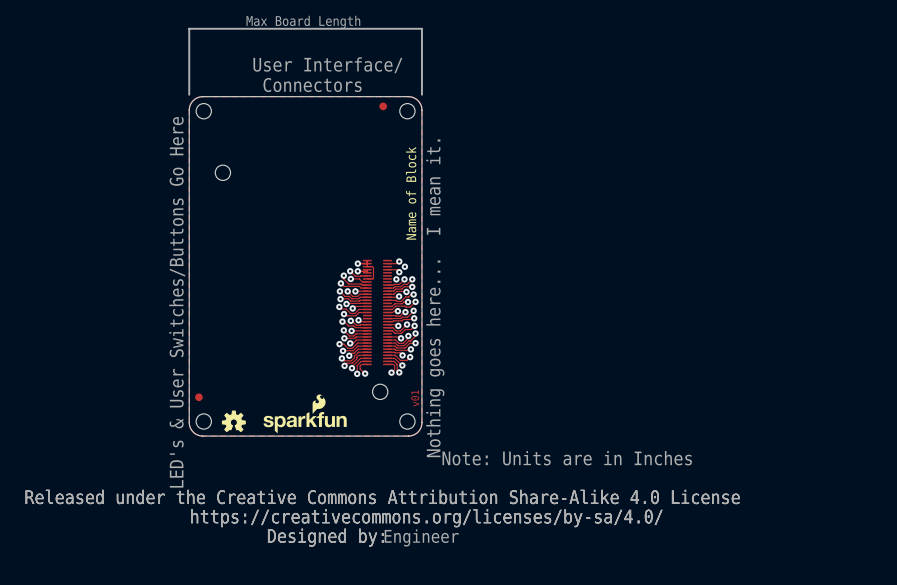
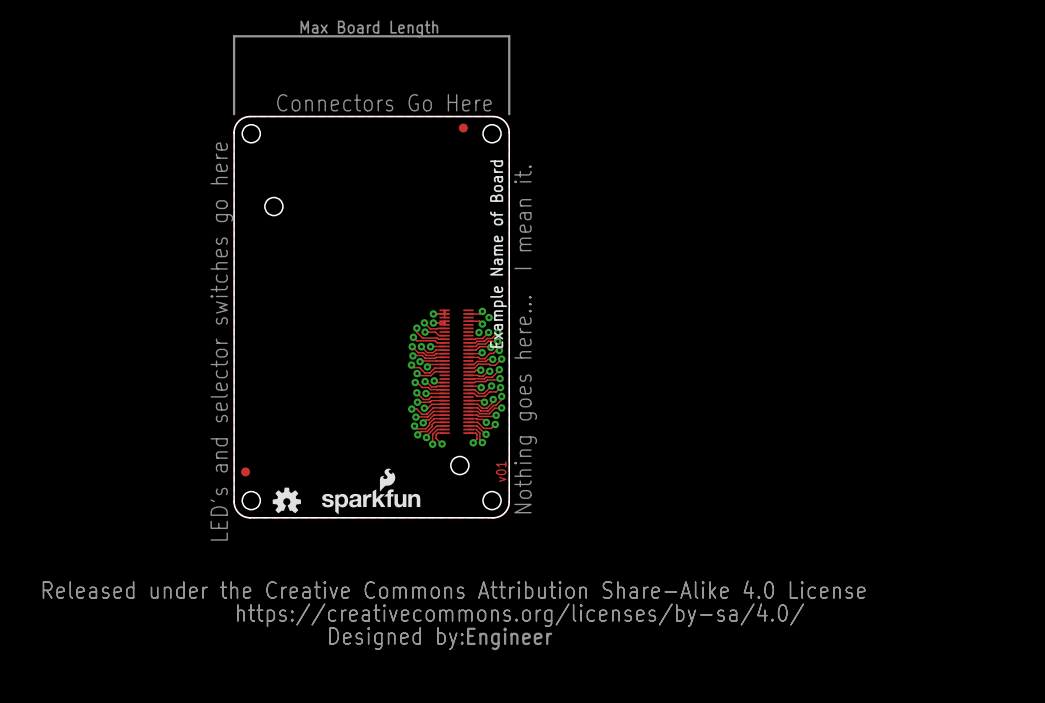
text: User Interface/ (327, 65) -> none
text: Connectors (312, 85) -> Connectors Go Here (384, 102)
text: Name of Block (411, 193) -> none
text: none -> Example Name of Board (498, 254)
track: (367, 266) (373, 267) (373, 278) (367, 278) -> none
text: LED's & User Switches/Buttons Go Here (177, 302) -> LED's and selector switches go here (221, 341)
text: Note: Units are in Inches (567, 458) -> none

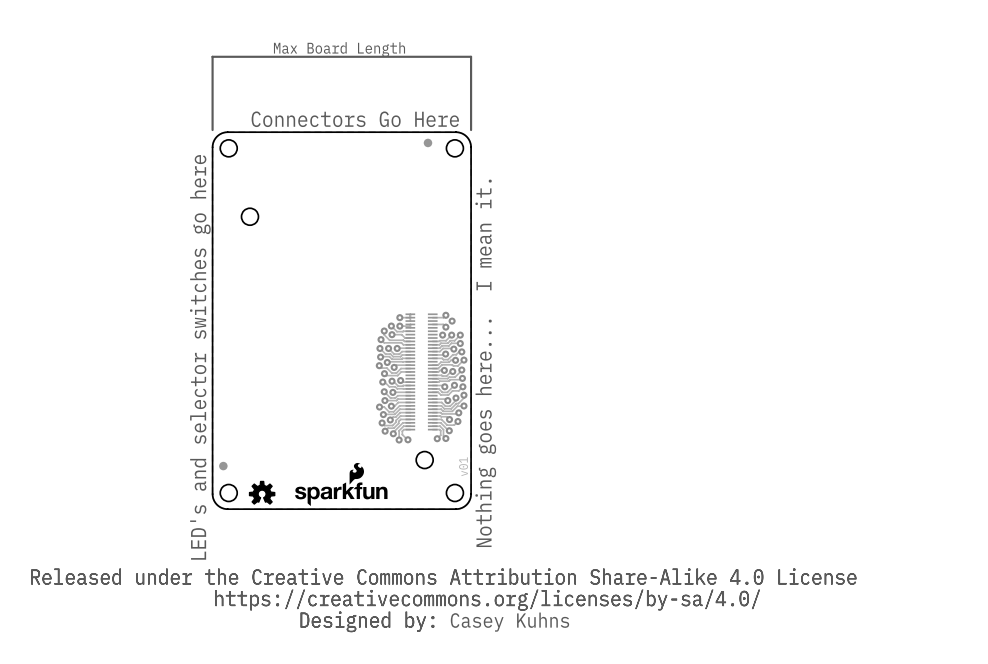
text: Example Name of Board (498, 254) -> none
text: Engineer (509, 638) -> none
text: none -> Casey Kuhns (509, 622)

